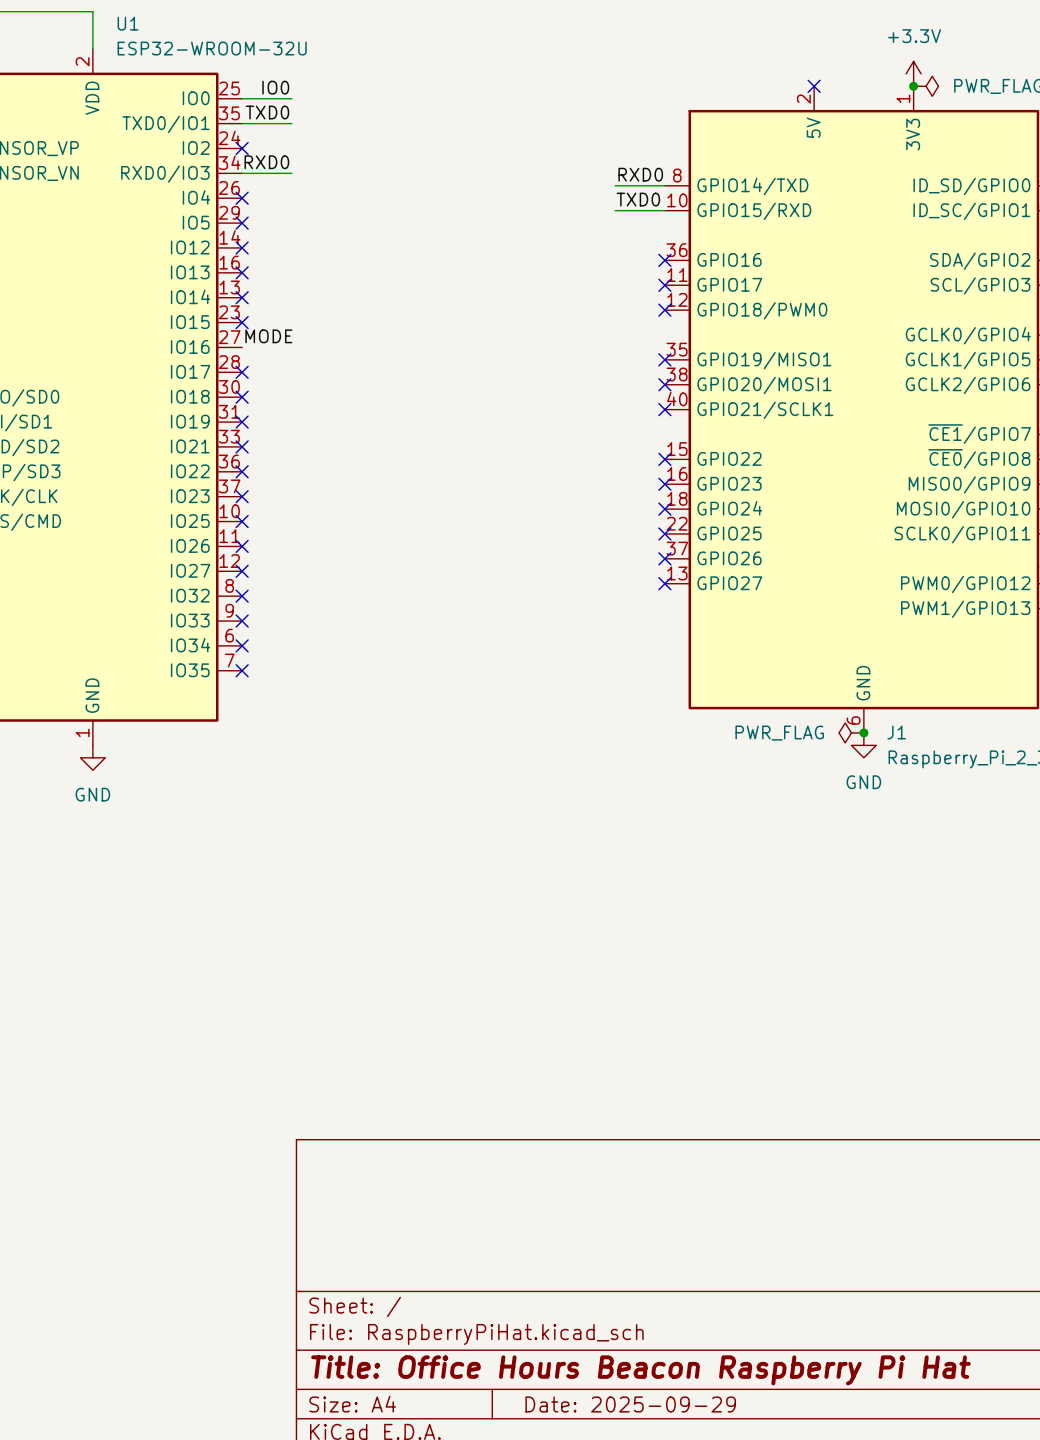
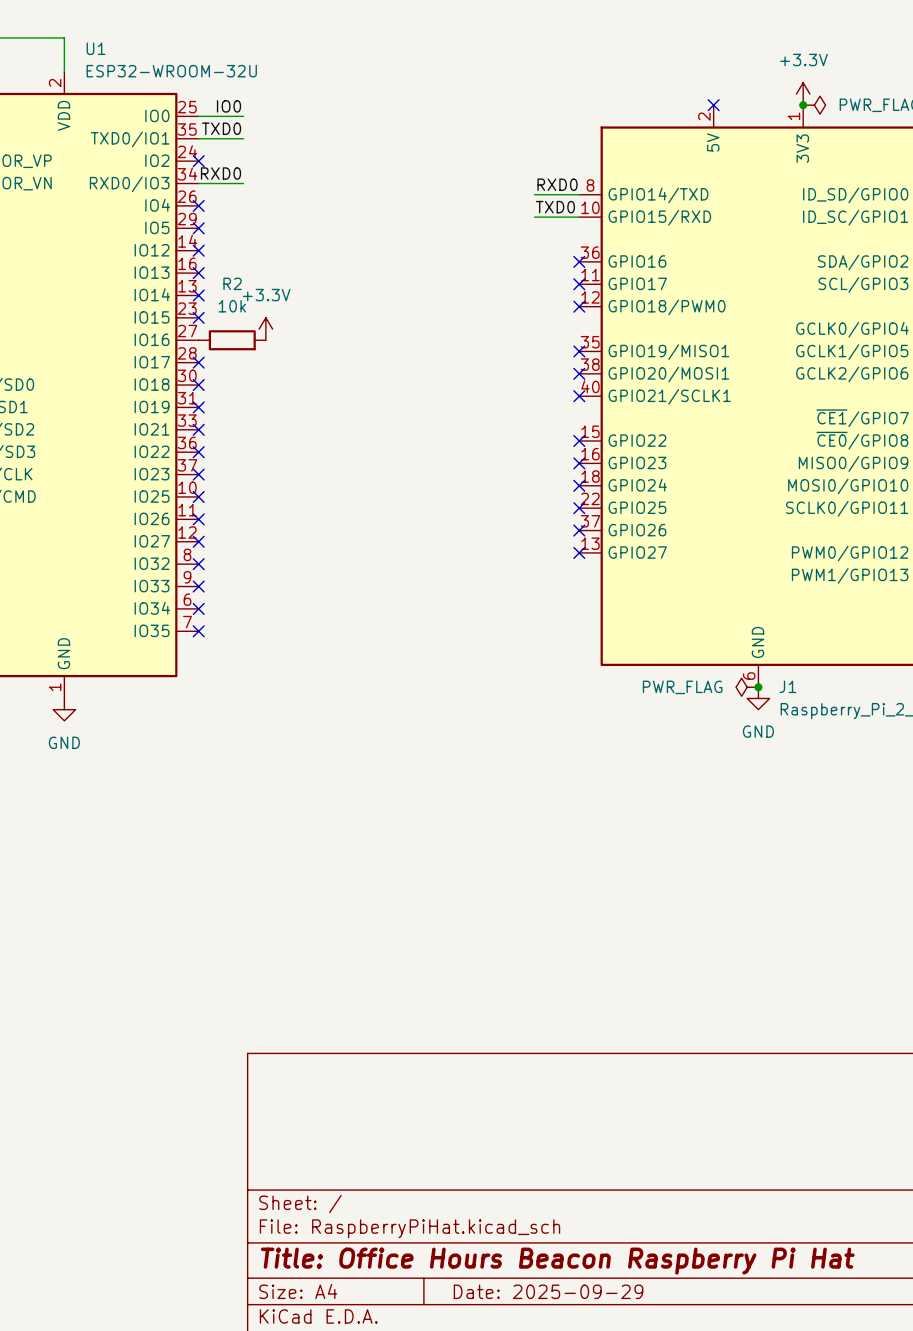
power symbol: none -> +3.3V (265, 329)
label: MODE (268, 336) -> none
R2: none -> 10k (232, 340)

